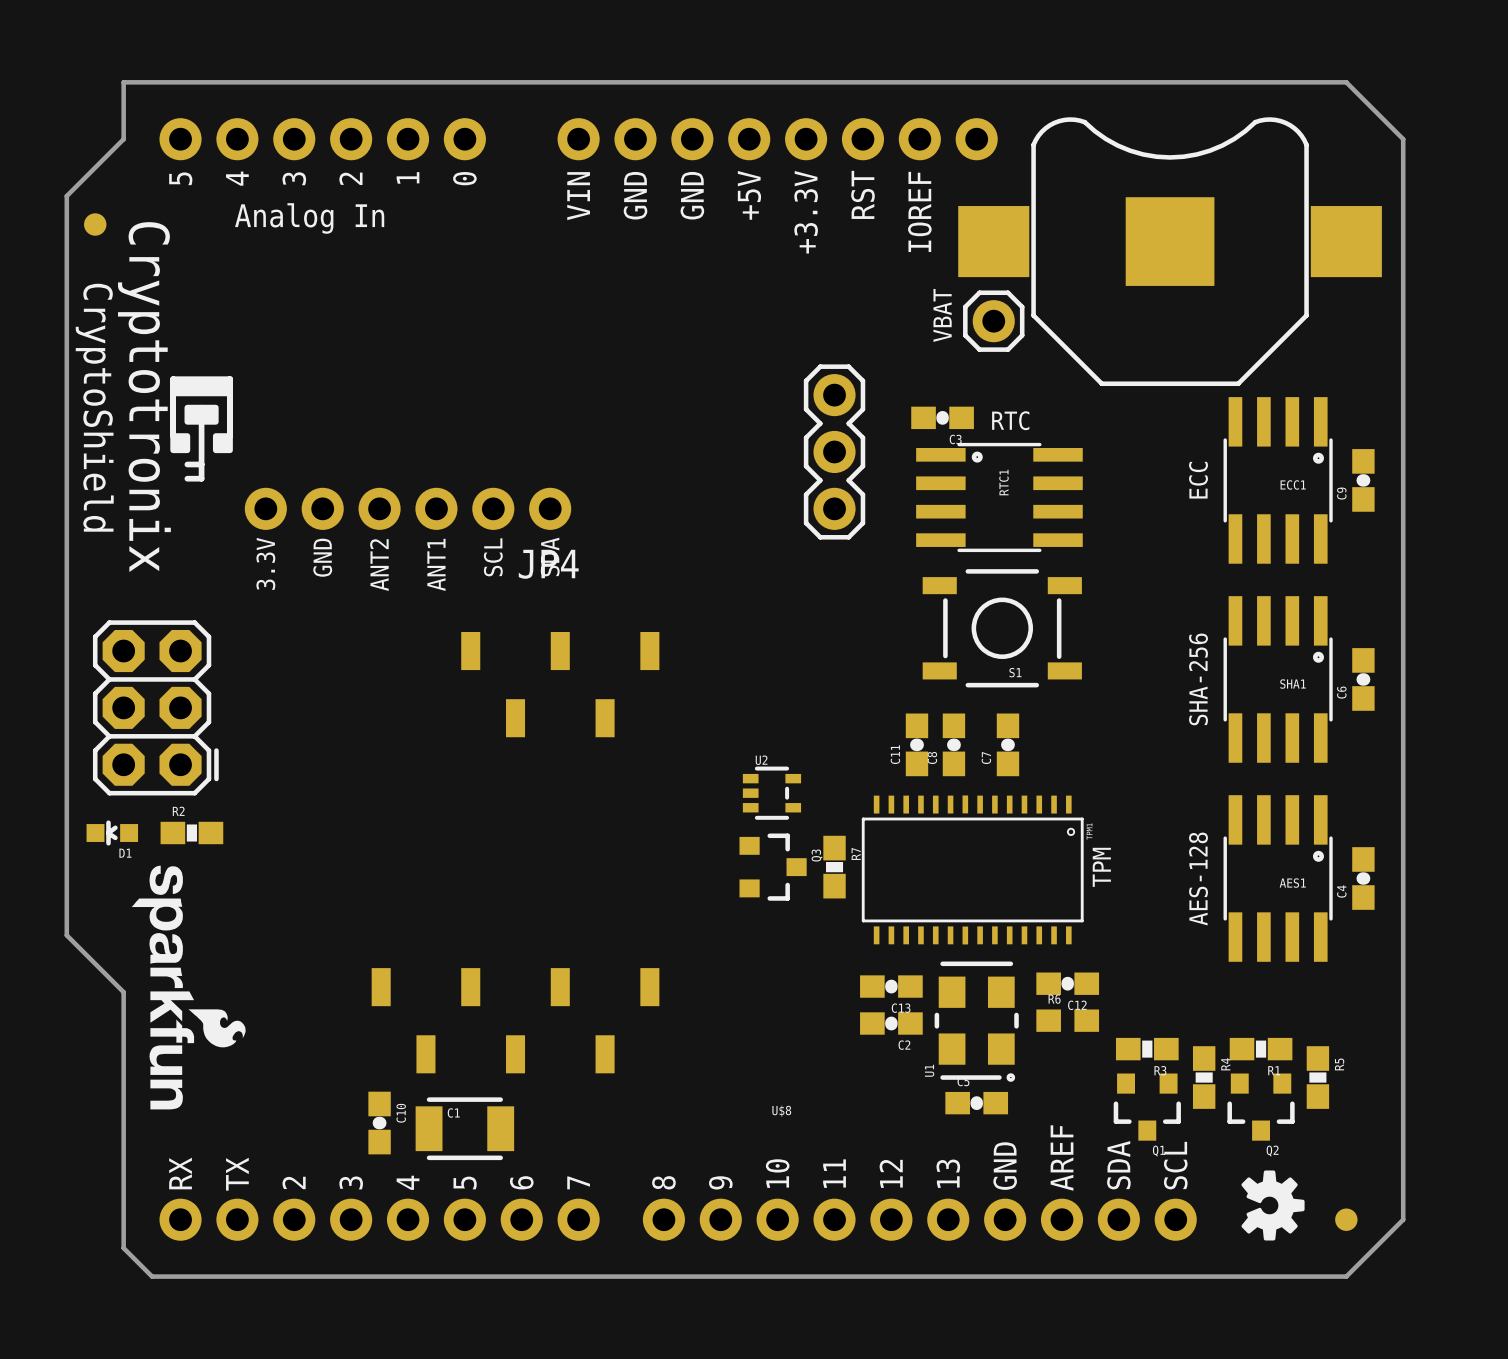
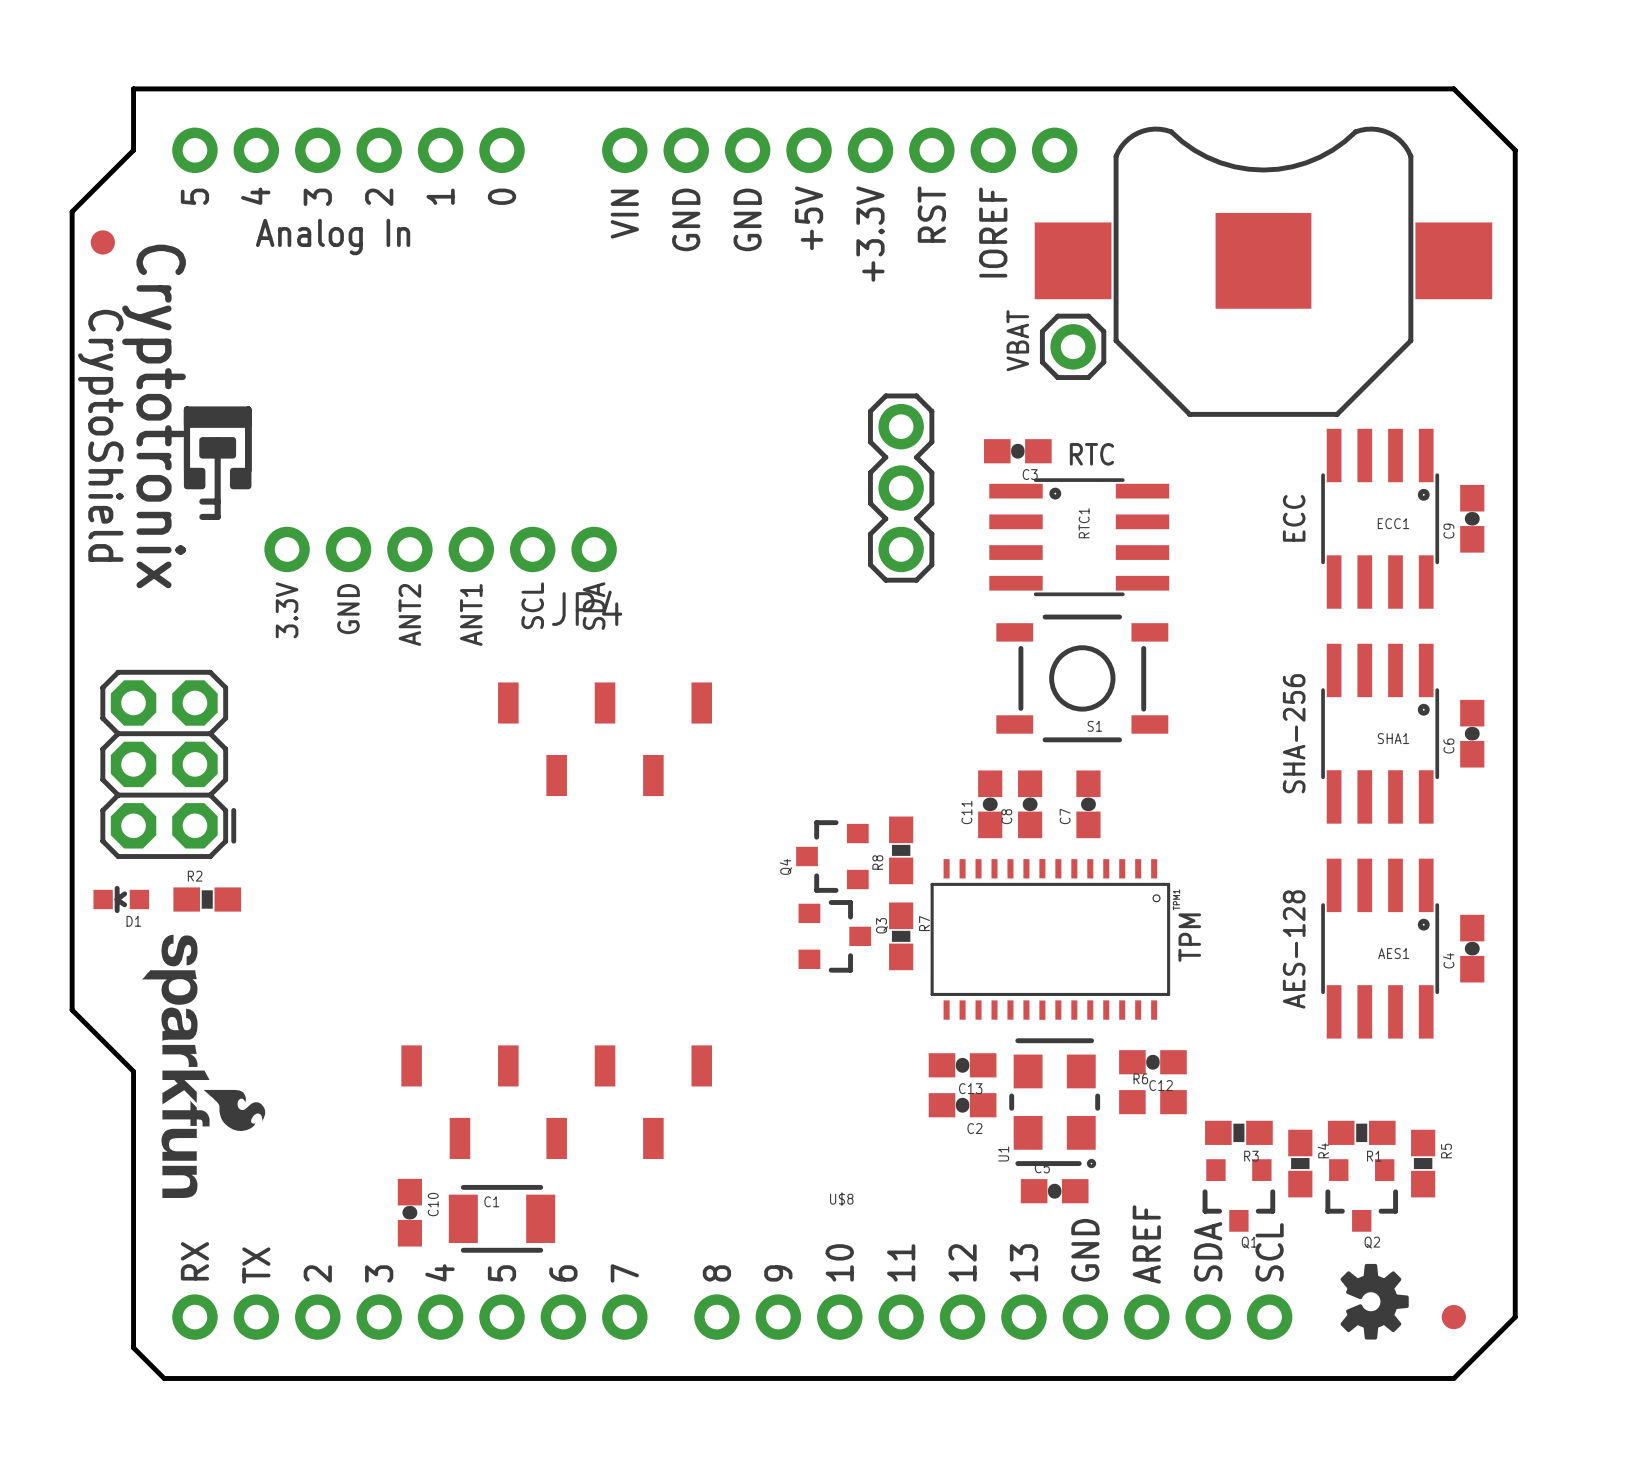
R8: none -> (901, 850)
Q4: none -> (832, 856)
U2: (771, 793) -> none

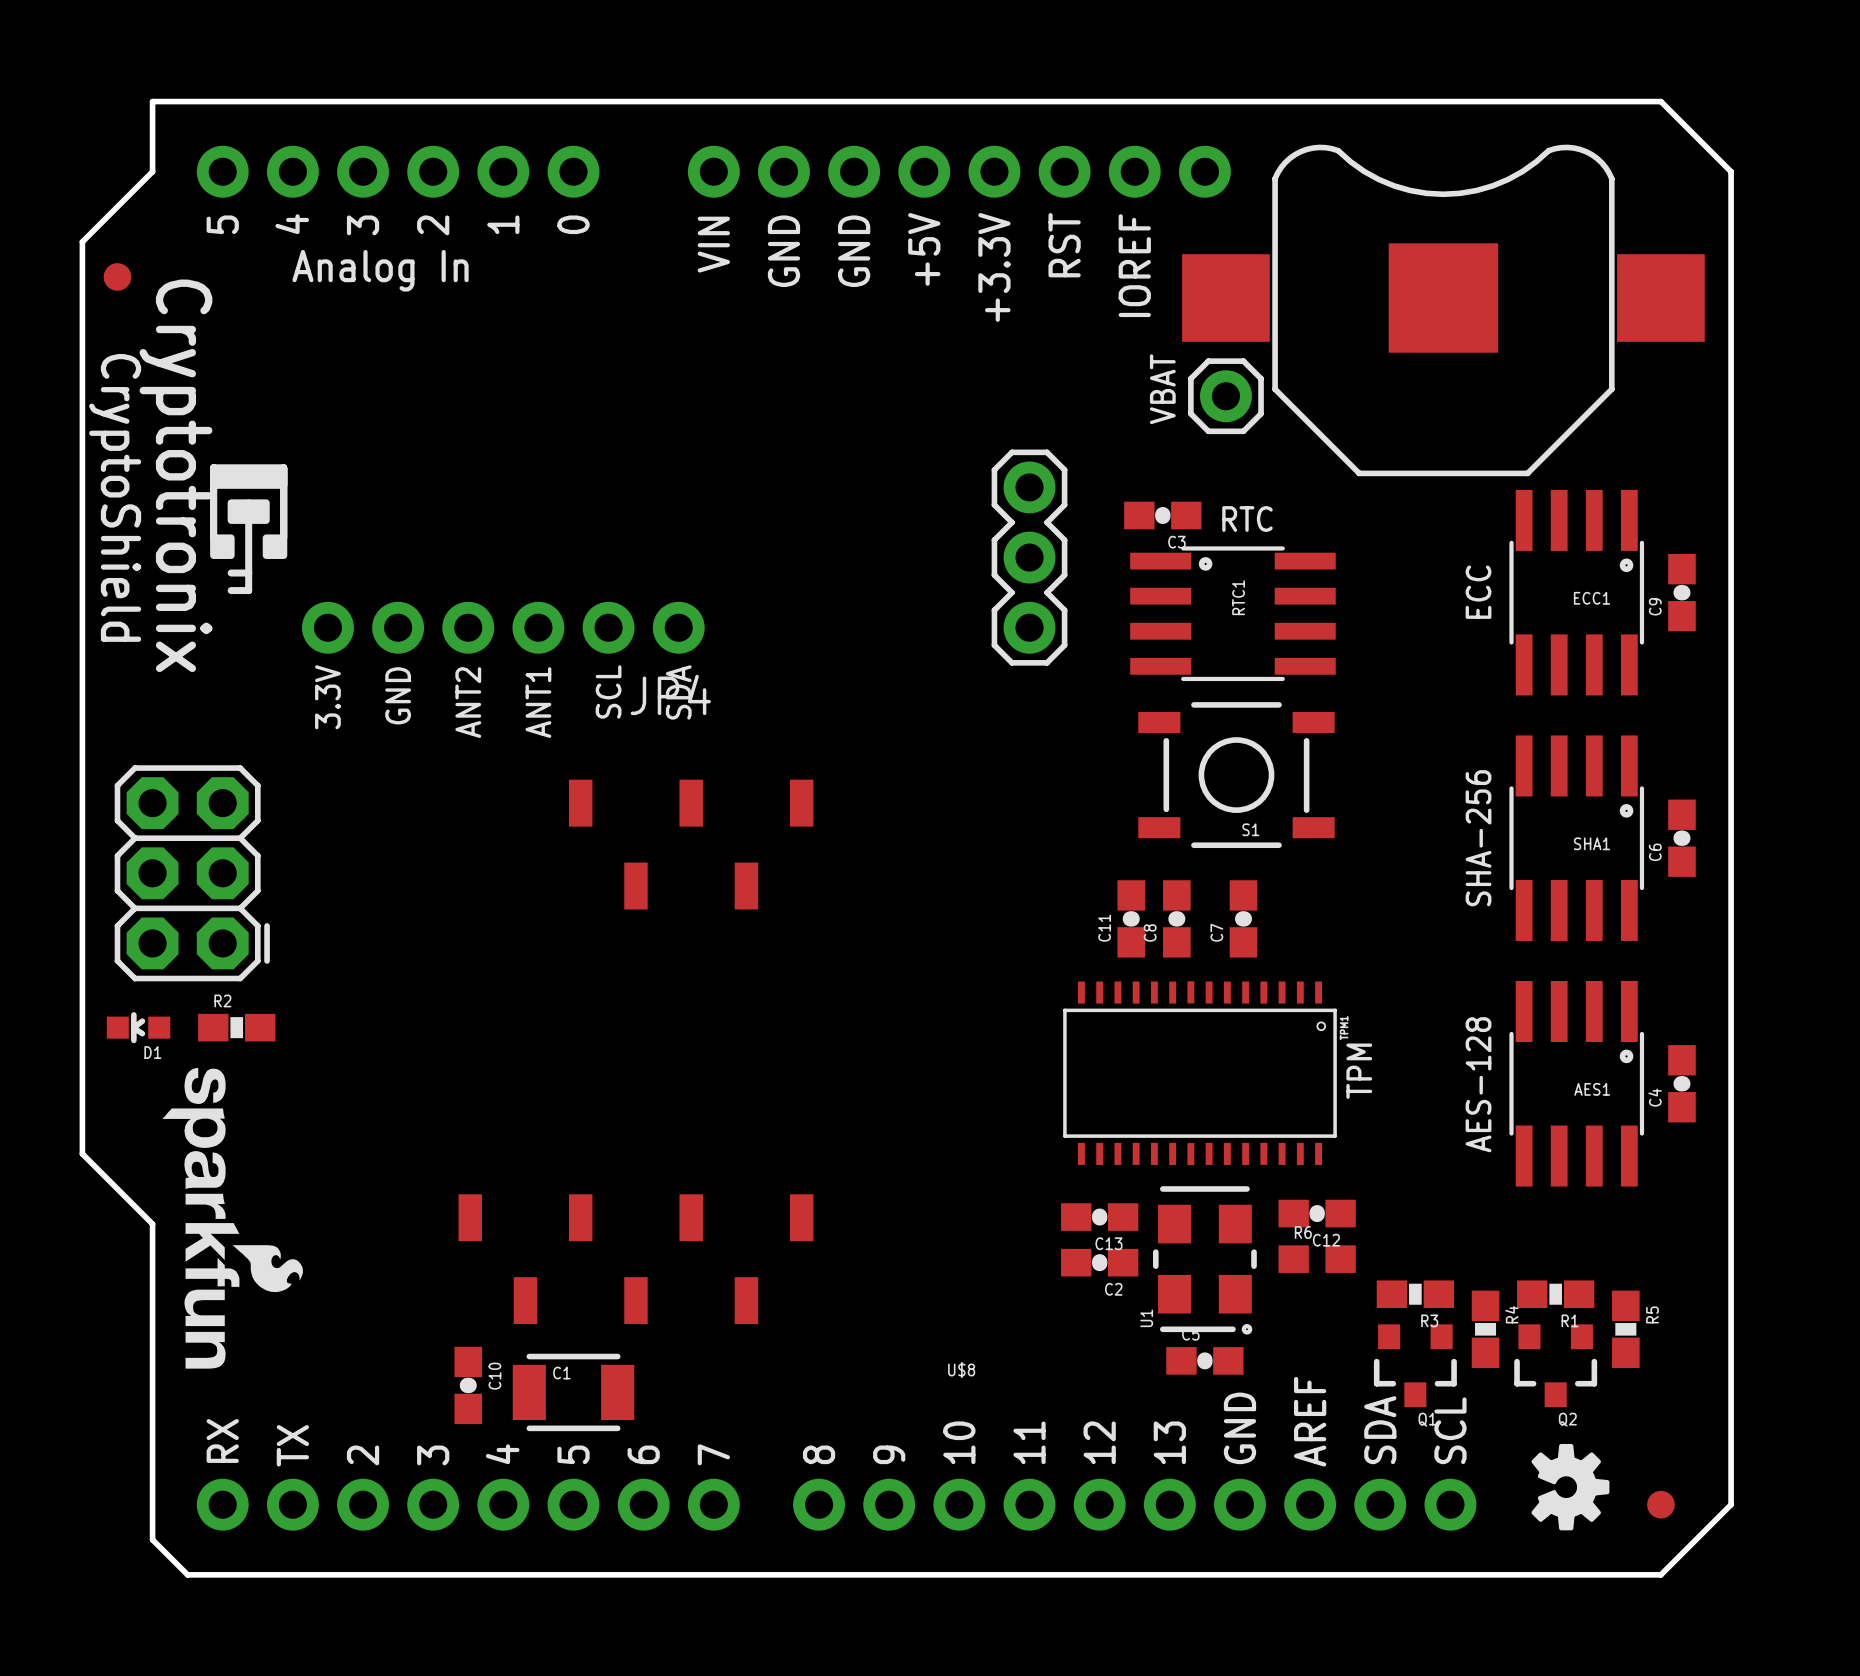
R8: (901, 850) -> none
Q4: (832, 856) -> none
Q3: (834, 936) -> none
R7: (901, 936) -> none

